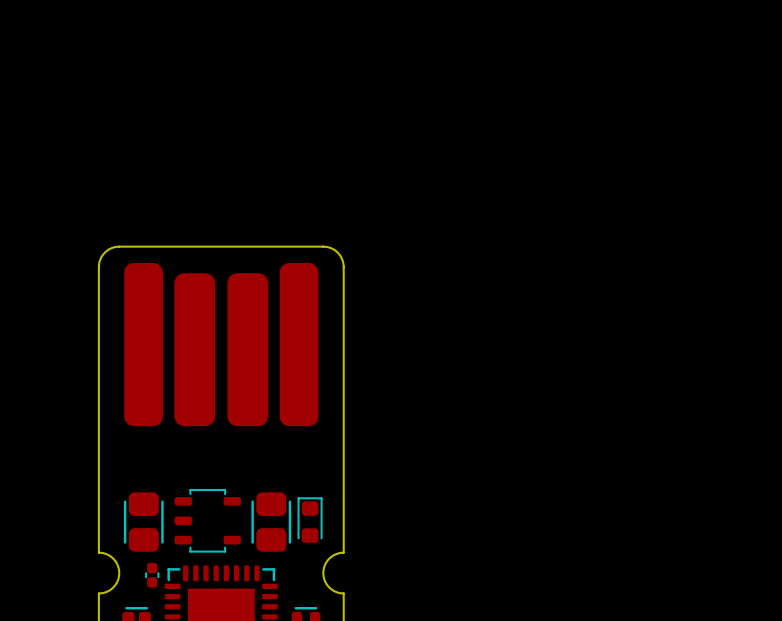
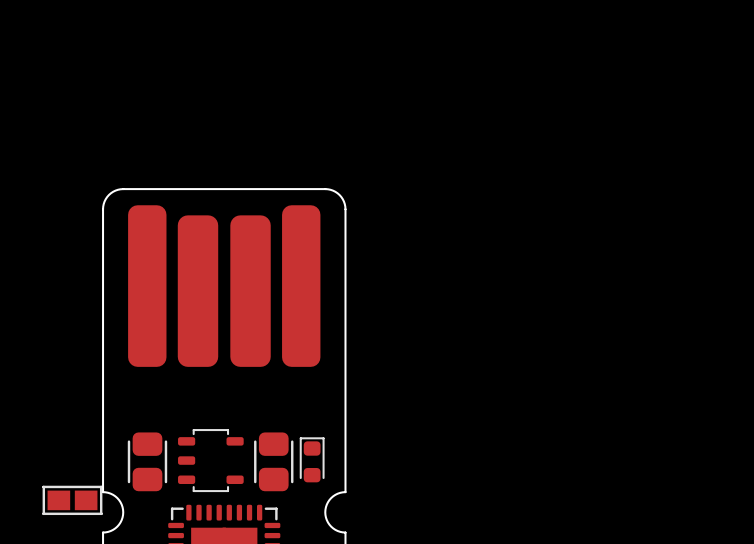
part: none -> (72, 500)
part: (152, 575) -> none

